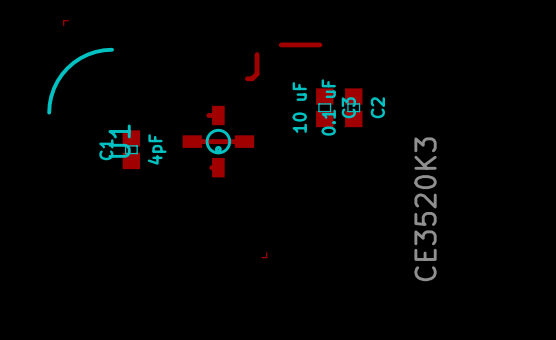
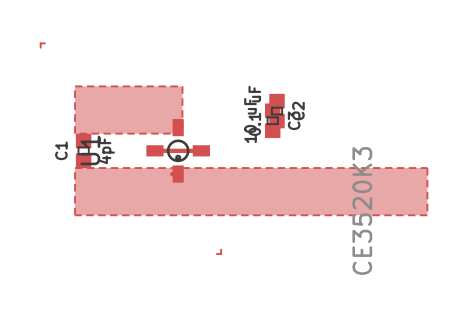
top track: (281, 44) (319, 44) -> none
line: (112, 49) (87, 54) (67, 68) (53, 88) (49, 112) -> none
top track: (257, 54) (257, 73) (252, 78) (247, 78) -> none
top zone outline: none -> (75, 86) (75, 133) (182, 133) (182, 86) (75, 86)
C2 position: (353, 107) -> (277, 111)
top track: (208, 115) (215, 115) -> none
C1 position: (131, 149) -> (83, 150)
top zone outline: none -> (75, 168) (75, 215) (427, 215) (427, 168) (75, 168)

